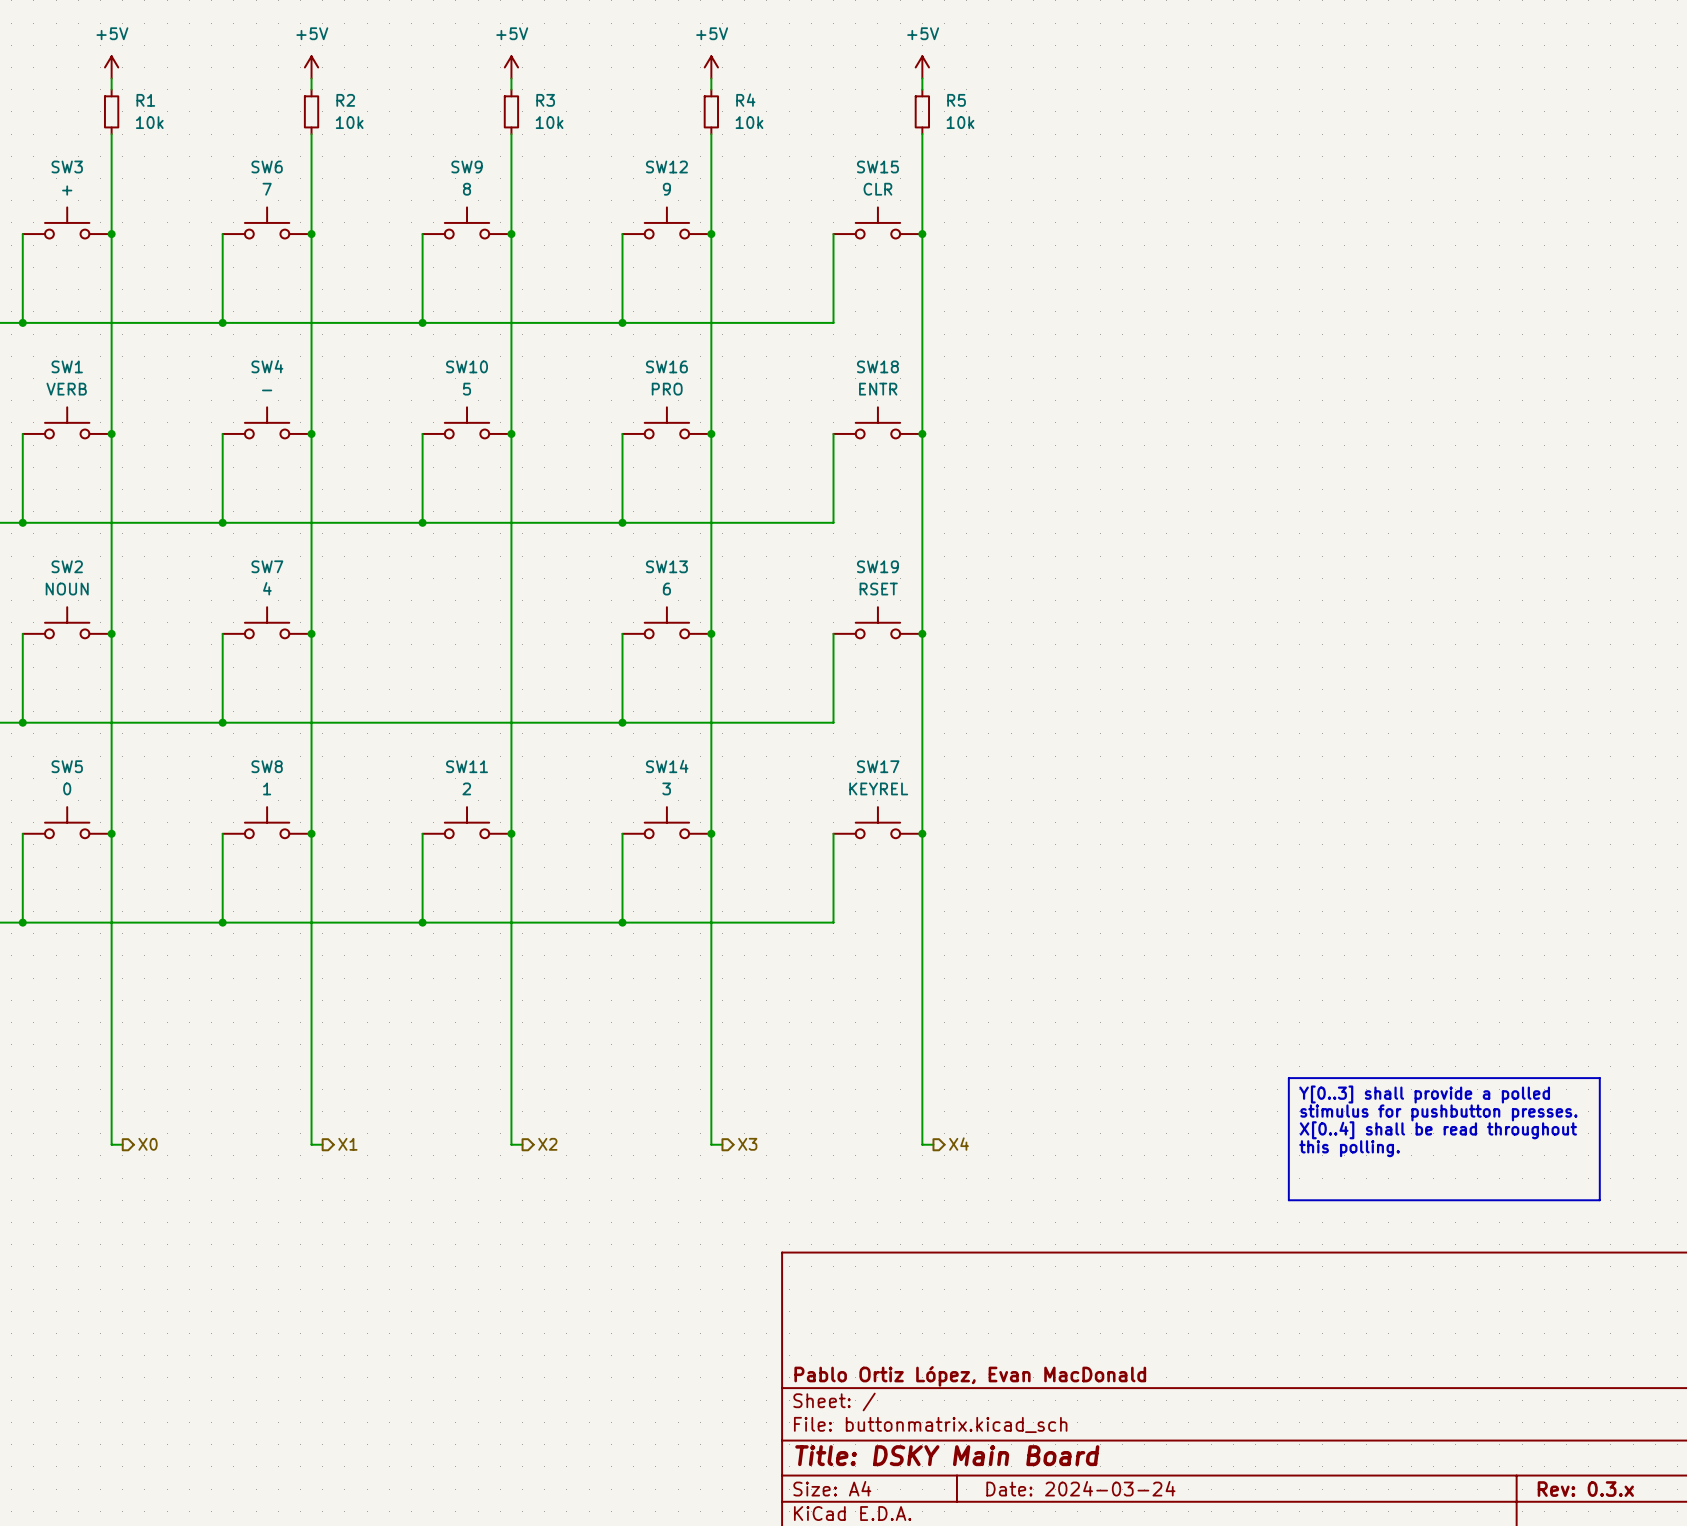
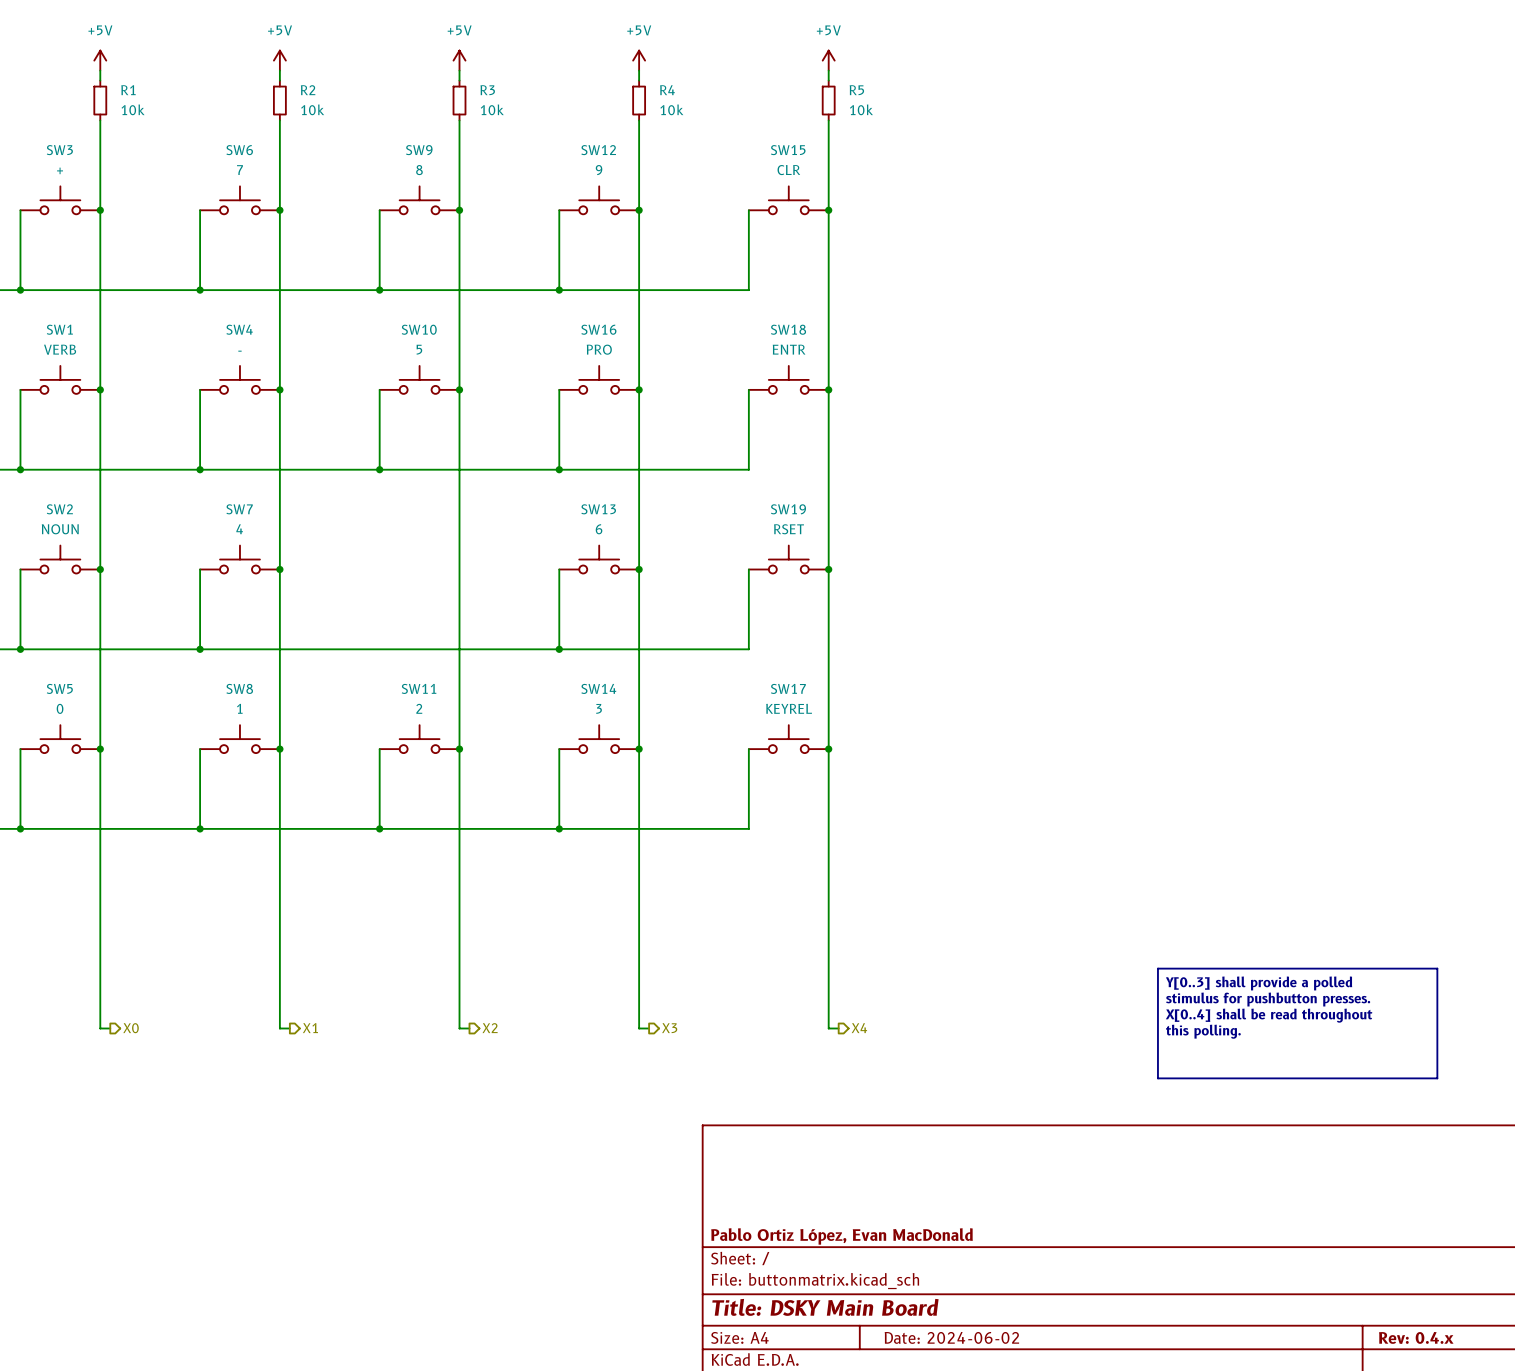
title block: Date: 2024-03-24 (1080, 1488) -> Date: 2024-06-02 (951, 1337)
title block: Rev: 0.3.x (1585, 1489) -> Rev: 0.4.x (1416, 1337)

